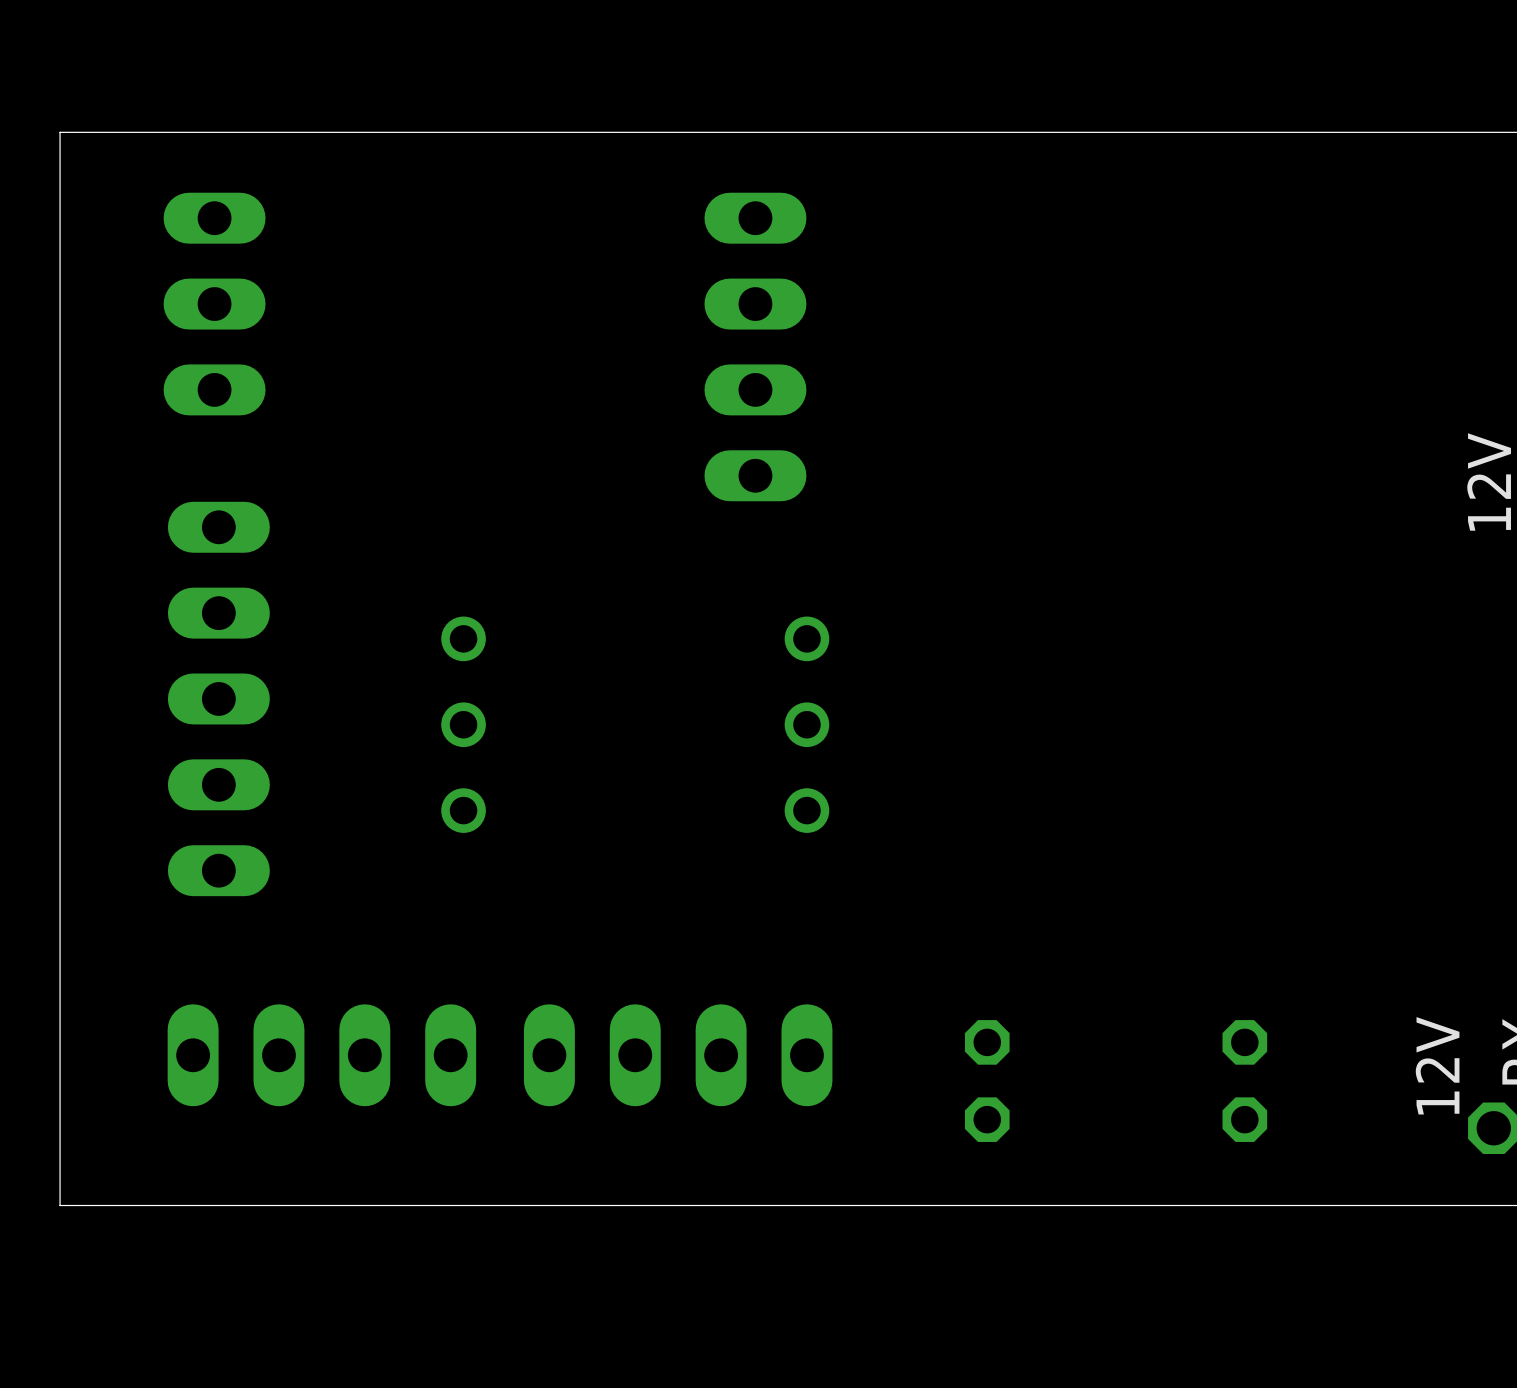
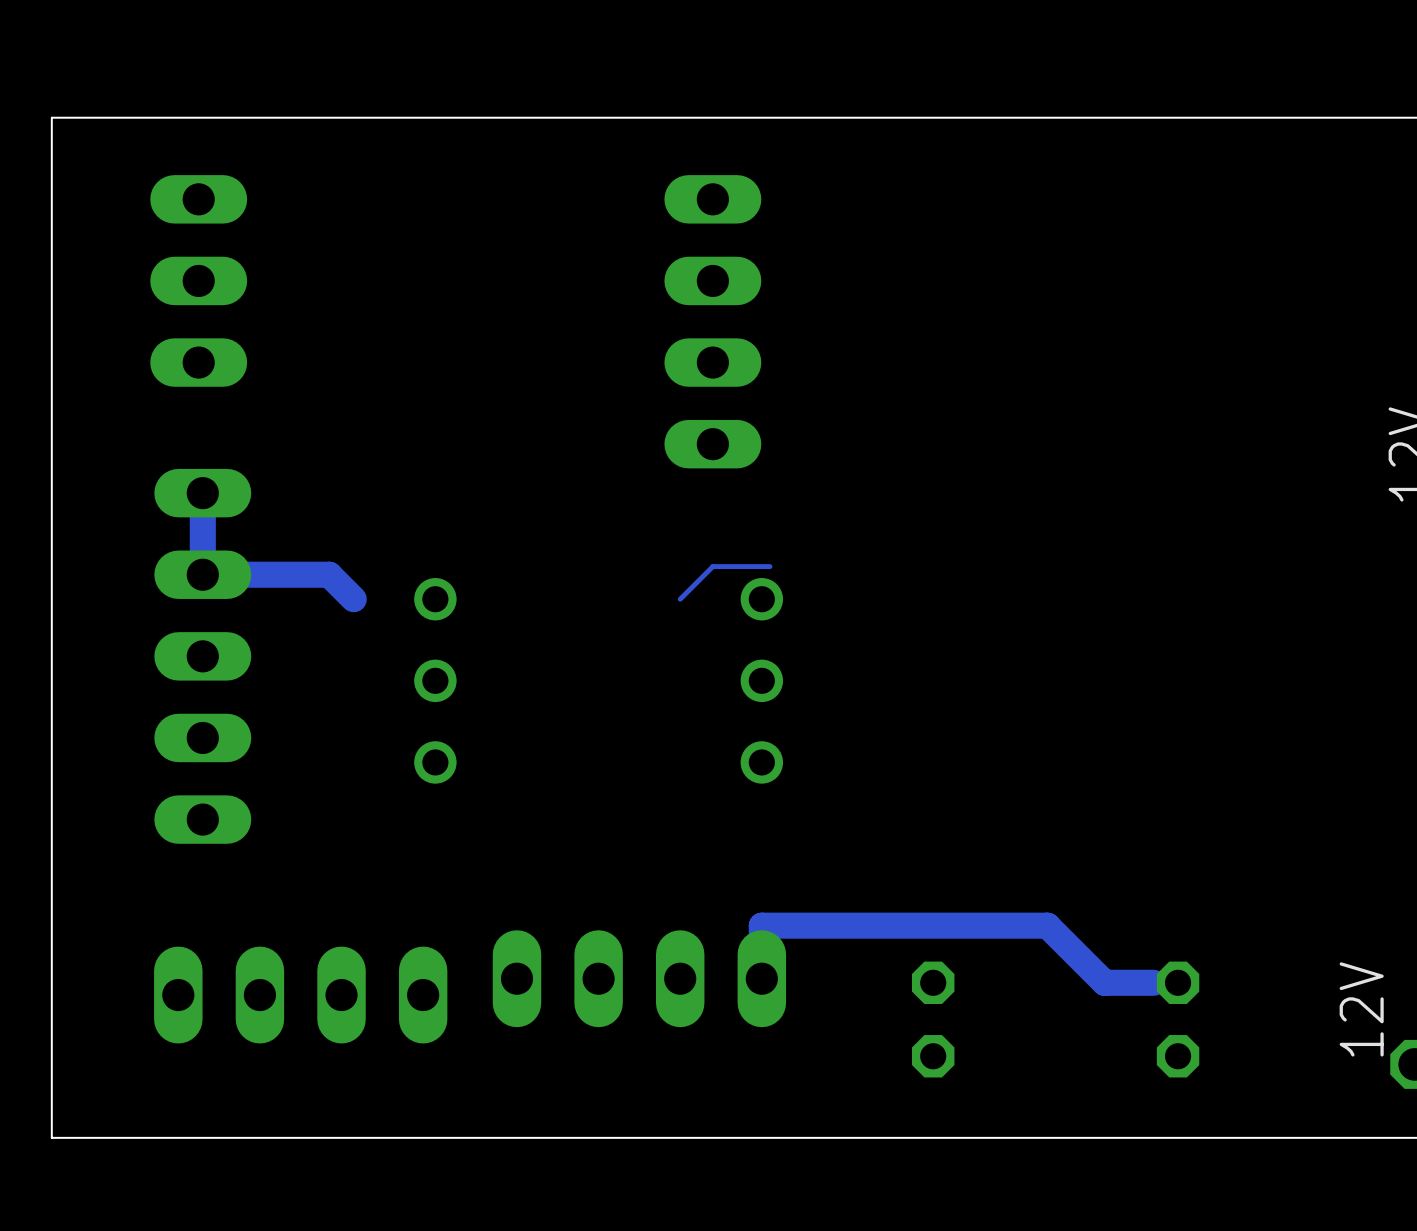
bottom track: none -> (202, 493) (202, 574) (329, 574) (353, 599)
bottom track: none -> (769, 566) (712, 566) (680, 599)
bottom track: none -> (761, 978) (761, 925) (1047, 925) (1104, 982) (1153, 982)
part position: (678, 1055) -> (639, 978)

